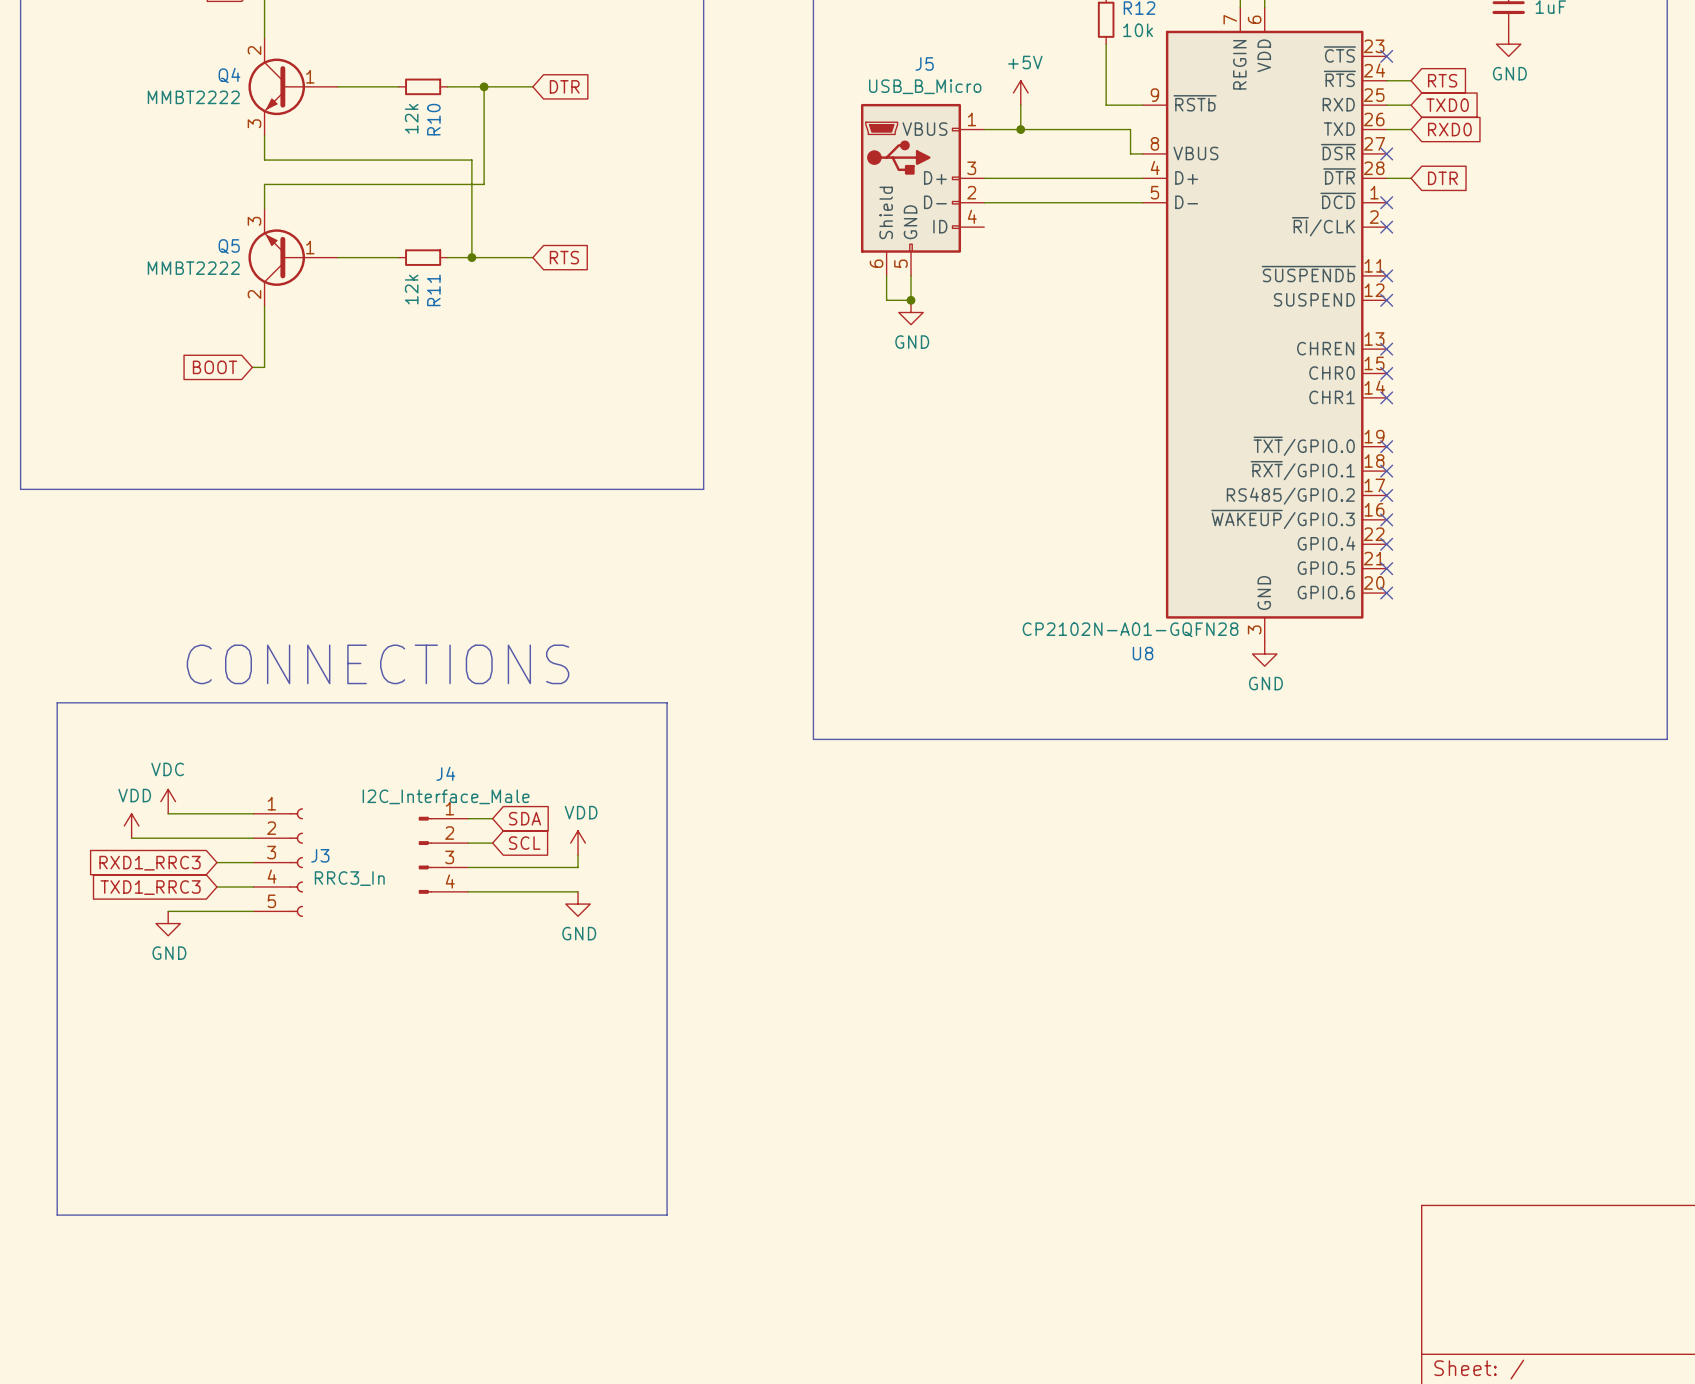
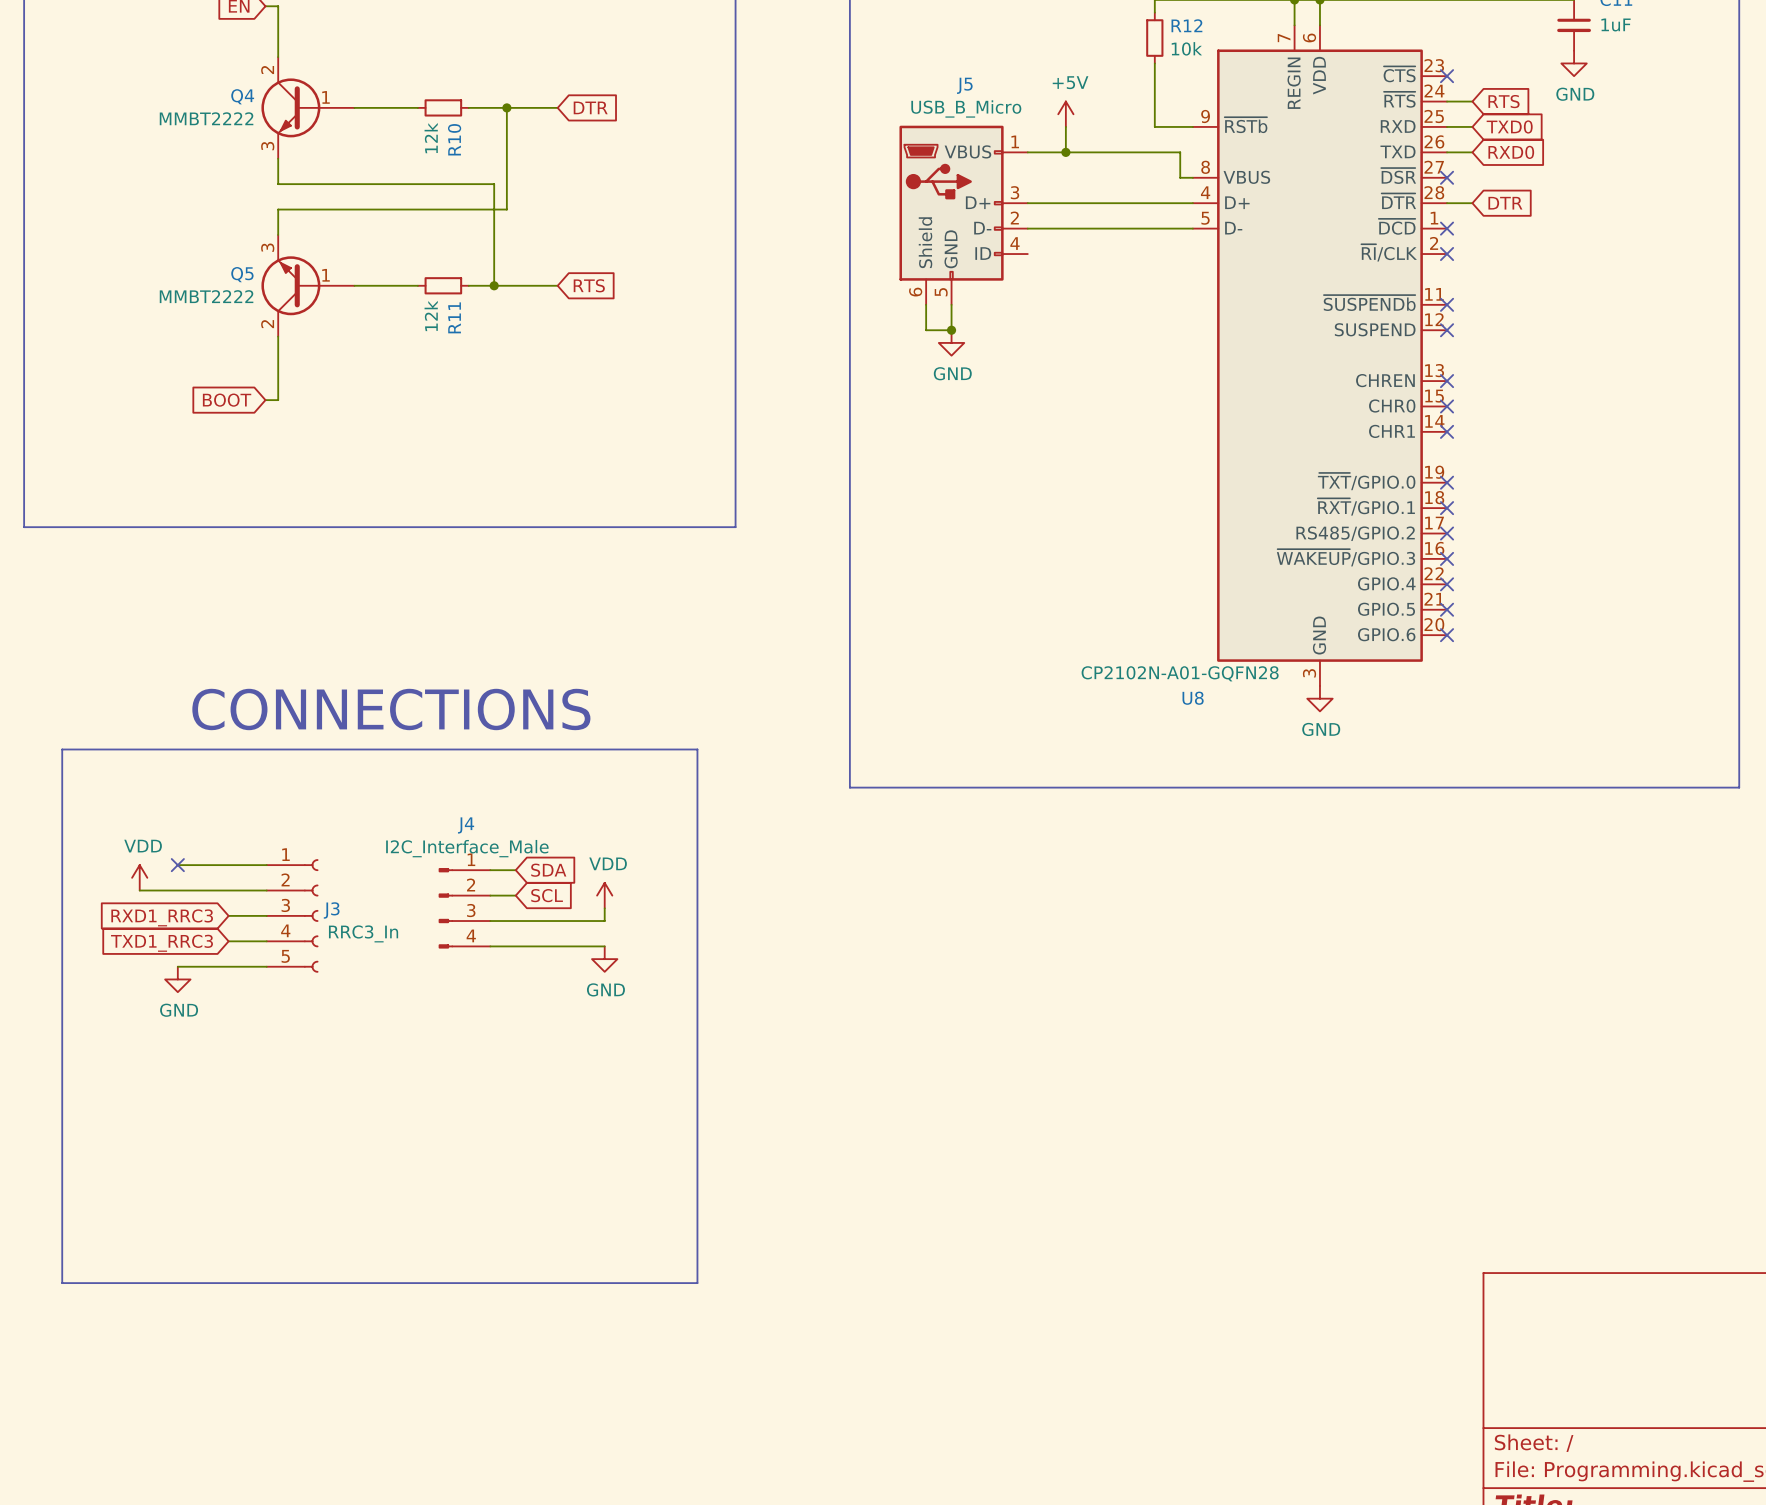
power symbol: VDC (168, 801) -> none
no-connect mark: none -> (177, 865)

